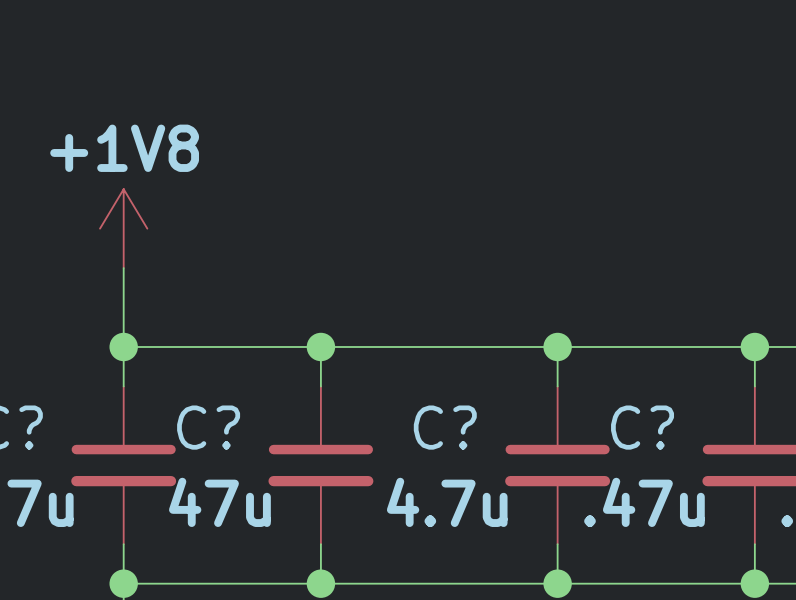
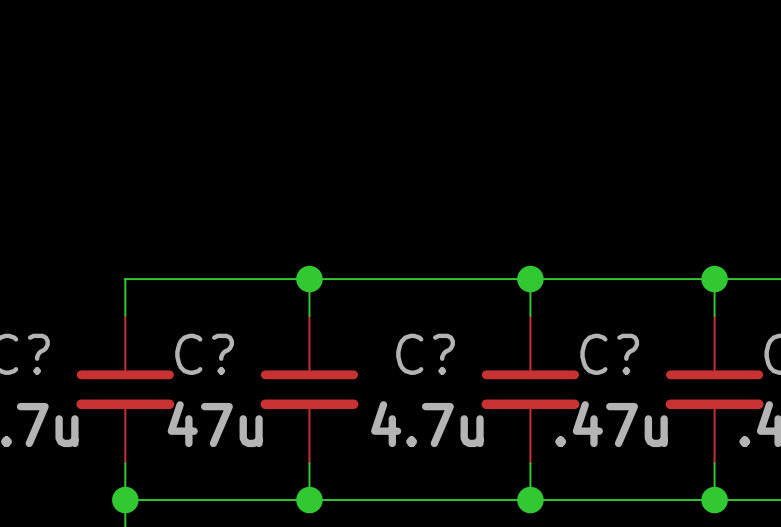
power symbol: +1V8 (123, 228) -> none
wire: (123, 268) (123, 346) -> none
junction: (123, 346) -> none

